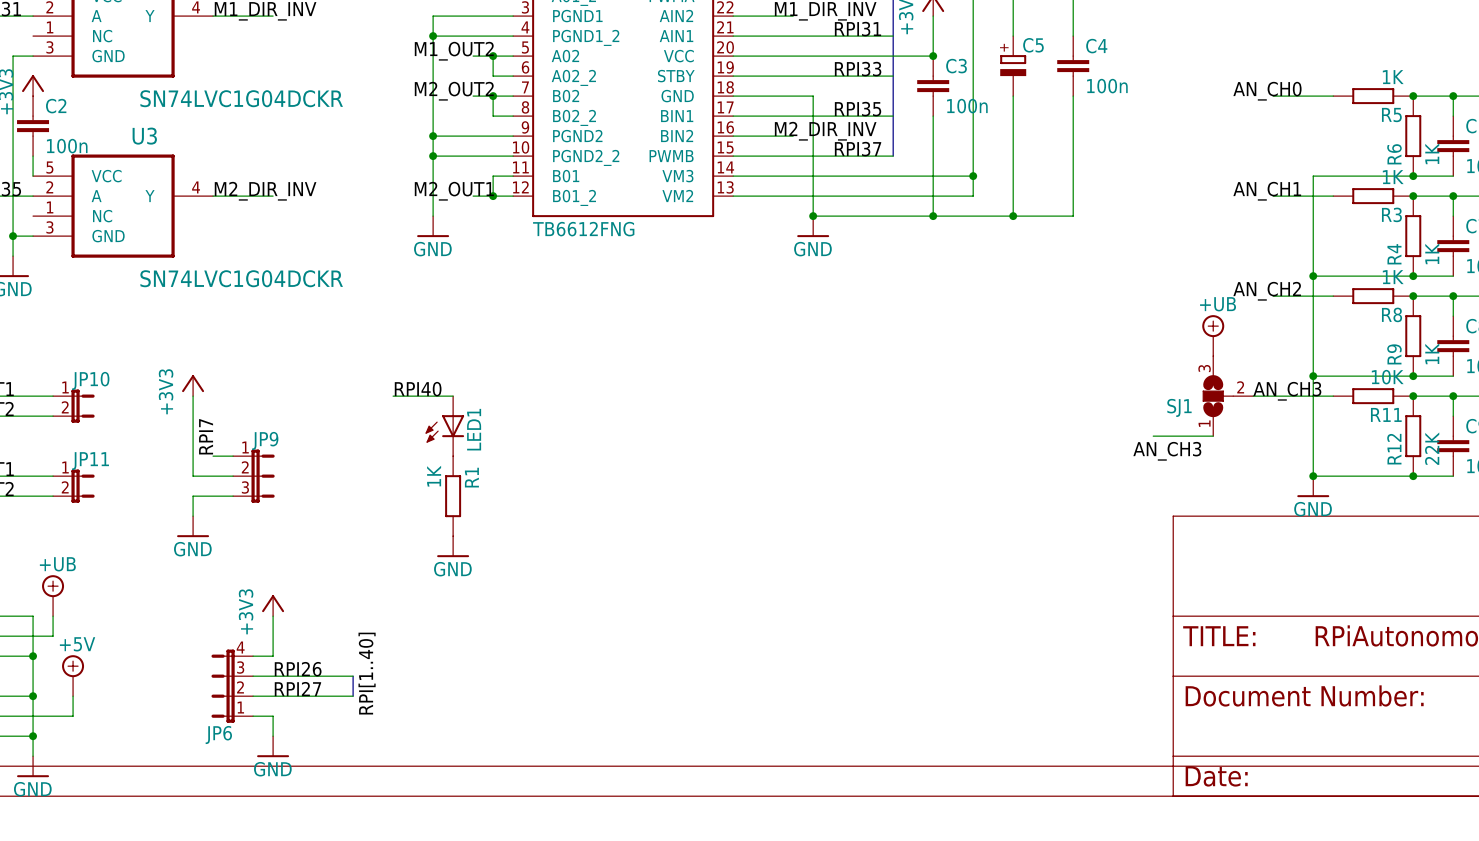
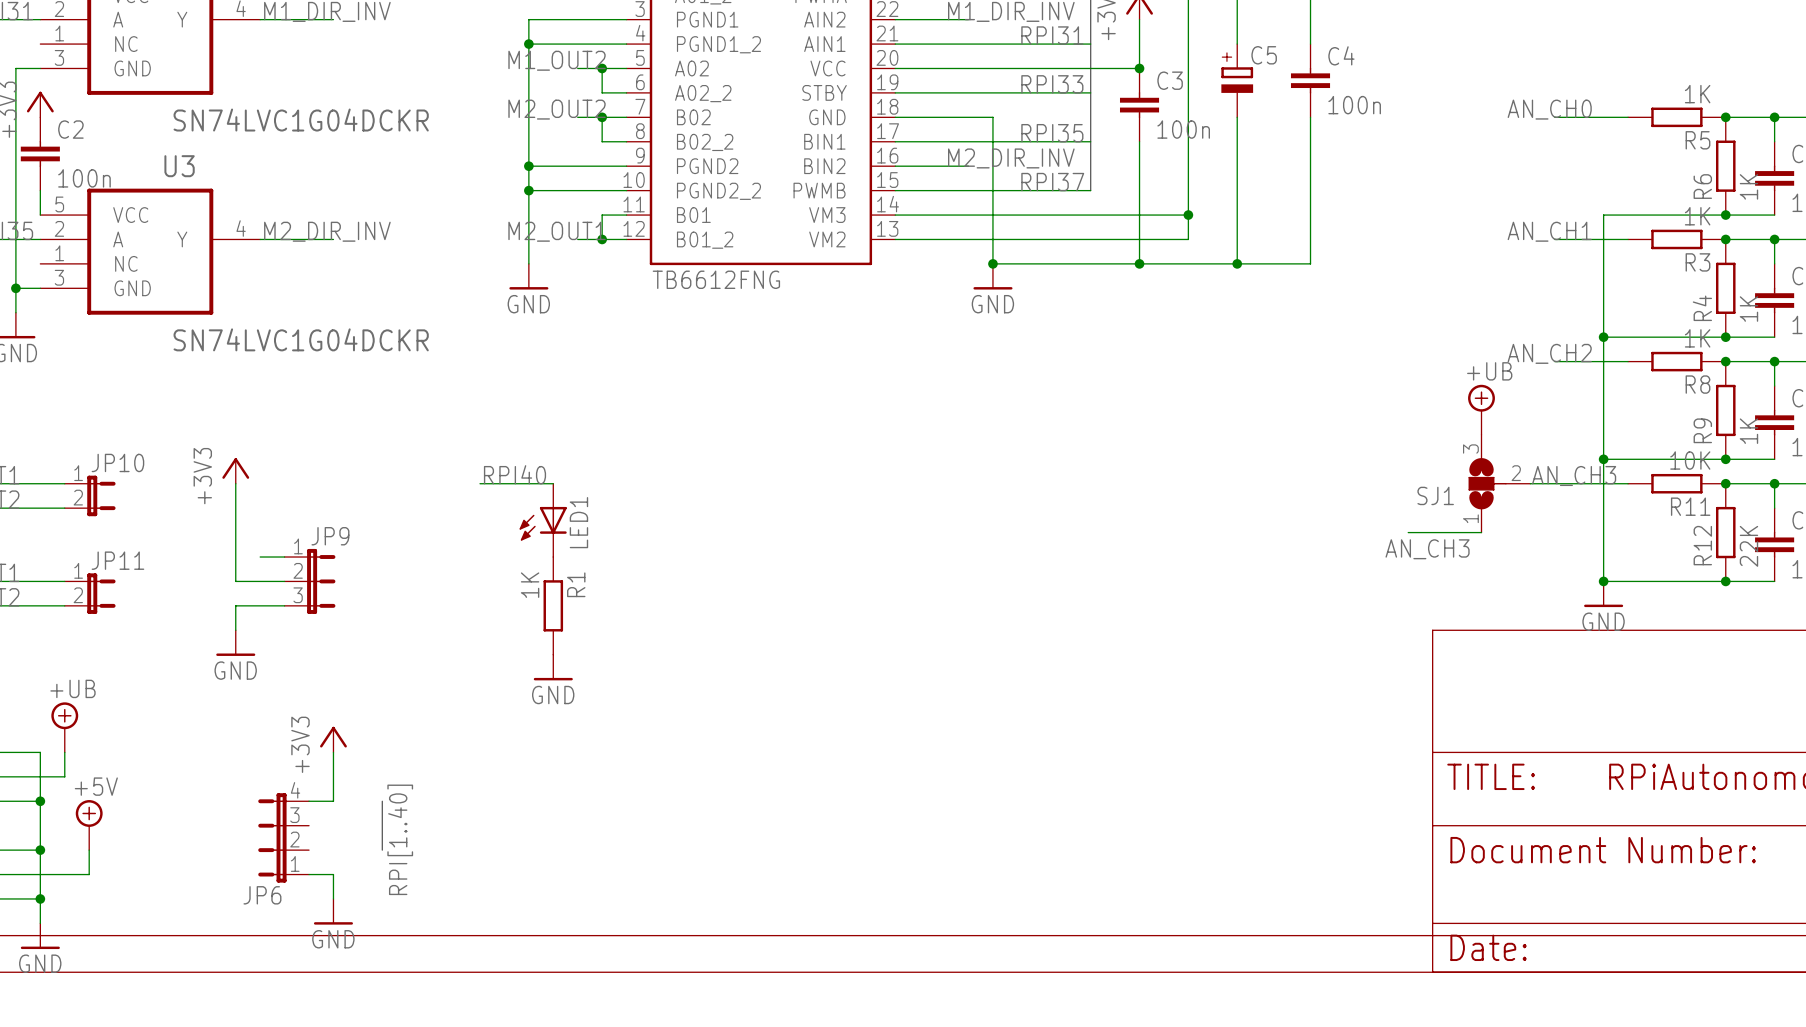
label: RPI7 (206, 436) -> none
bus: none -> (382, 801) (382, 850)
label: RPI26 (298, 669) -> none
label position: RPI[1..40] (367, 673) -> RPI[1..40] (400, 839)
wire: (253, 676) (353, 676) -> none
bus: (353, 676) (353, 696) -> none
label: RPI27 (297, 689) -> none
wire: (253, 696) (353, 696) -> none

